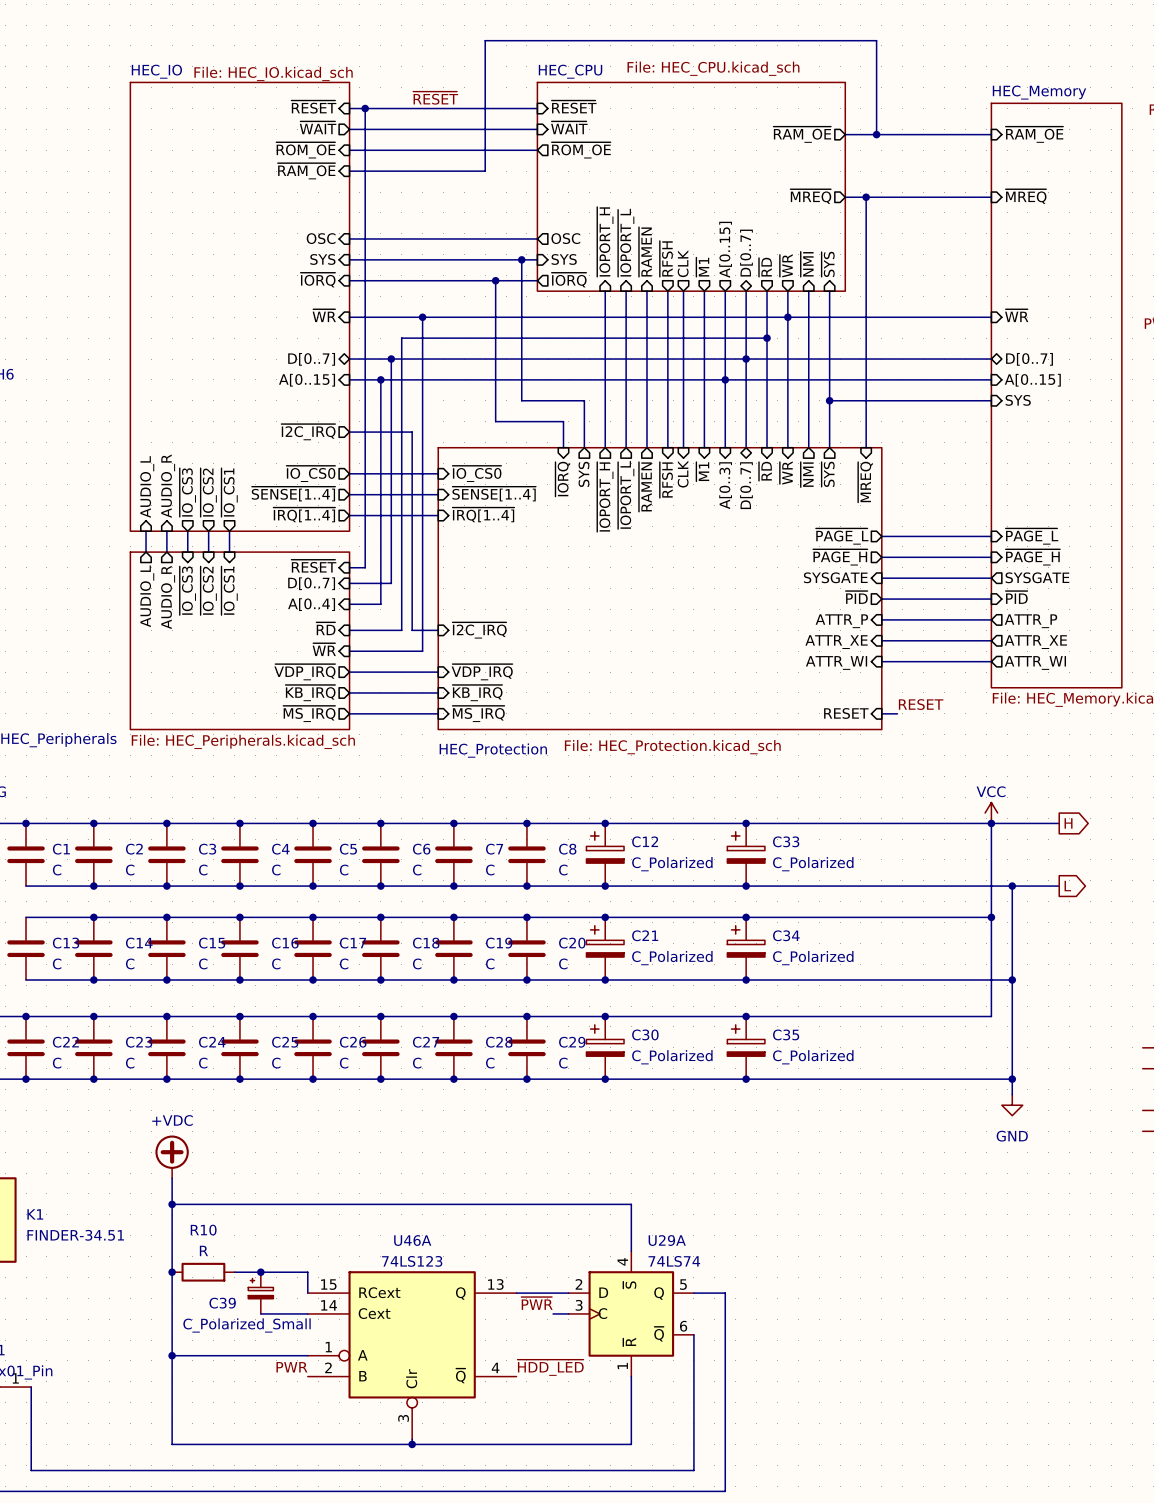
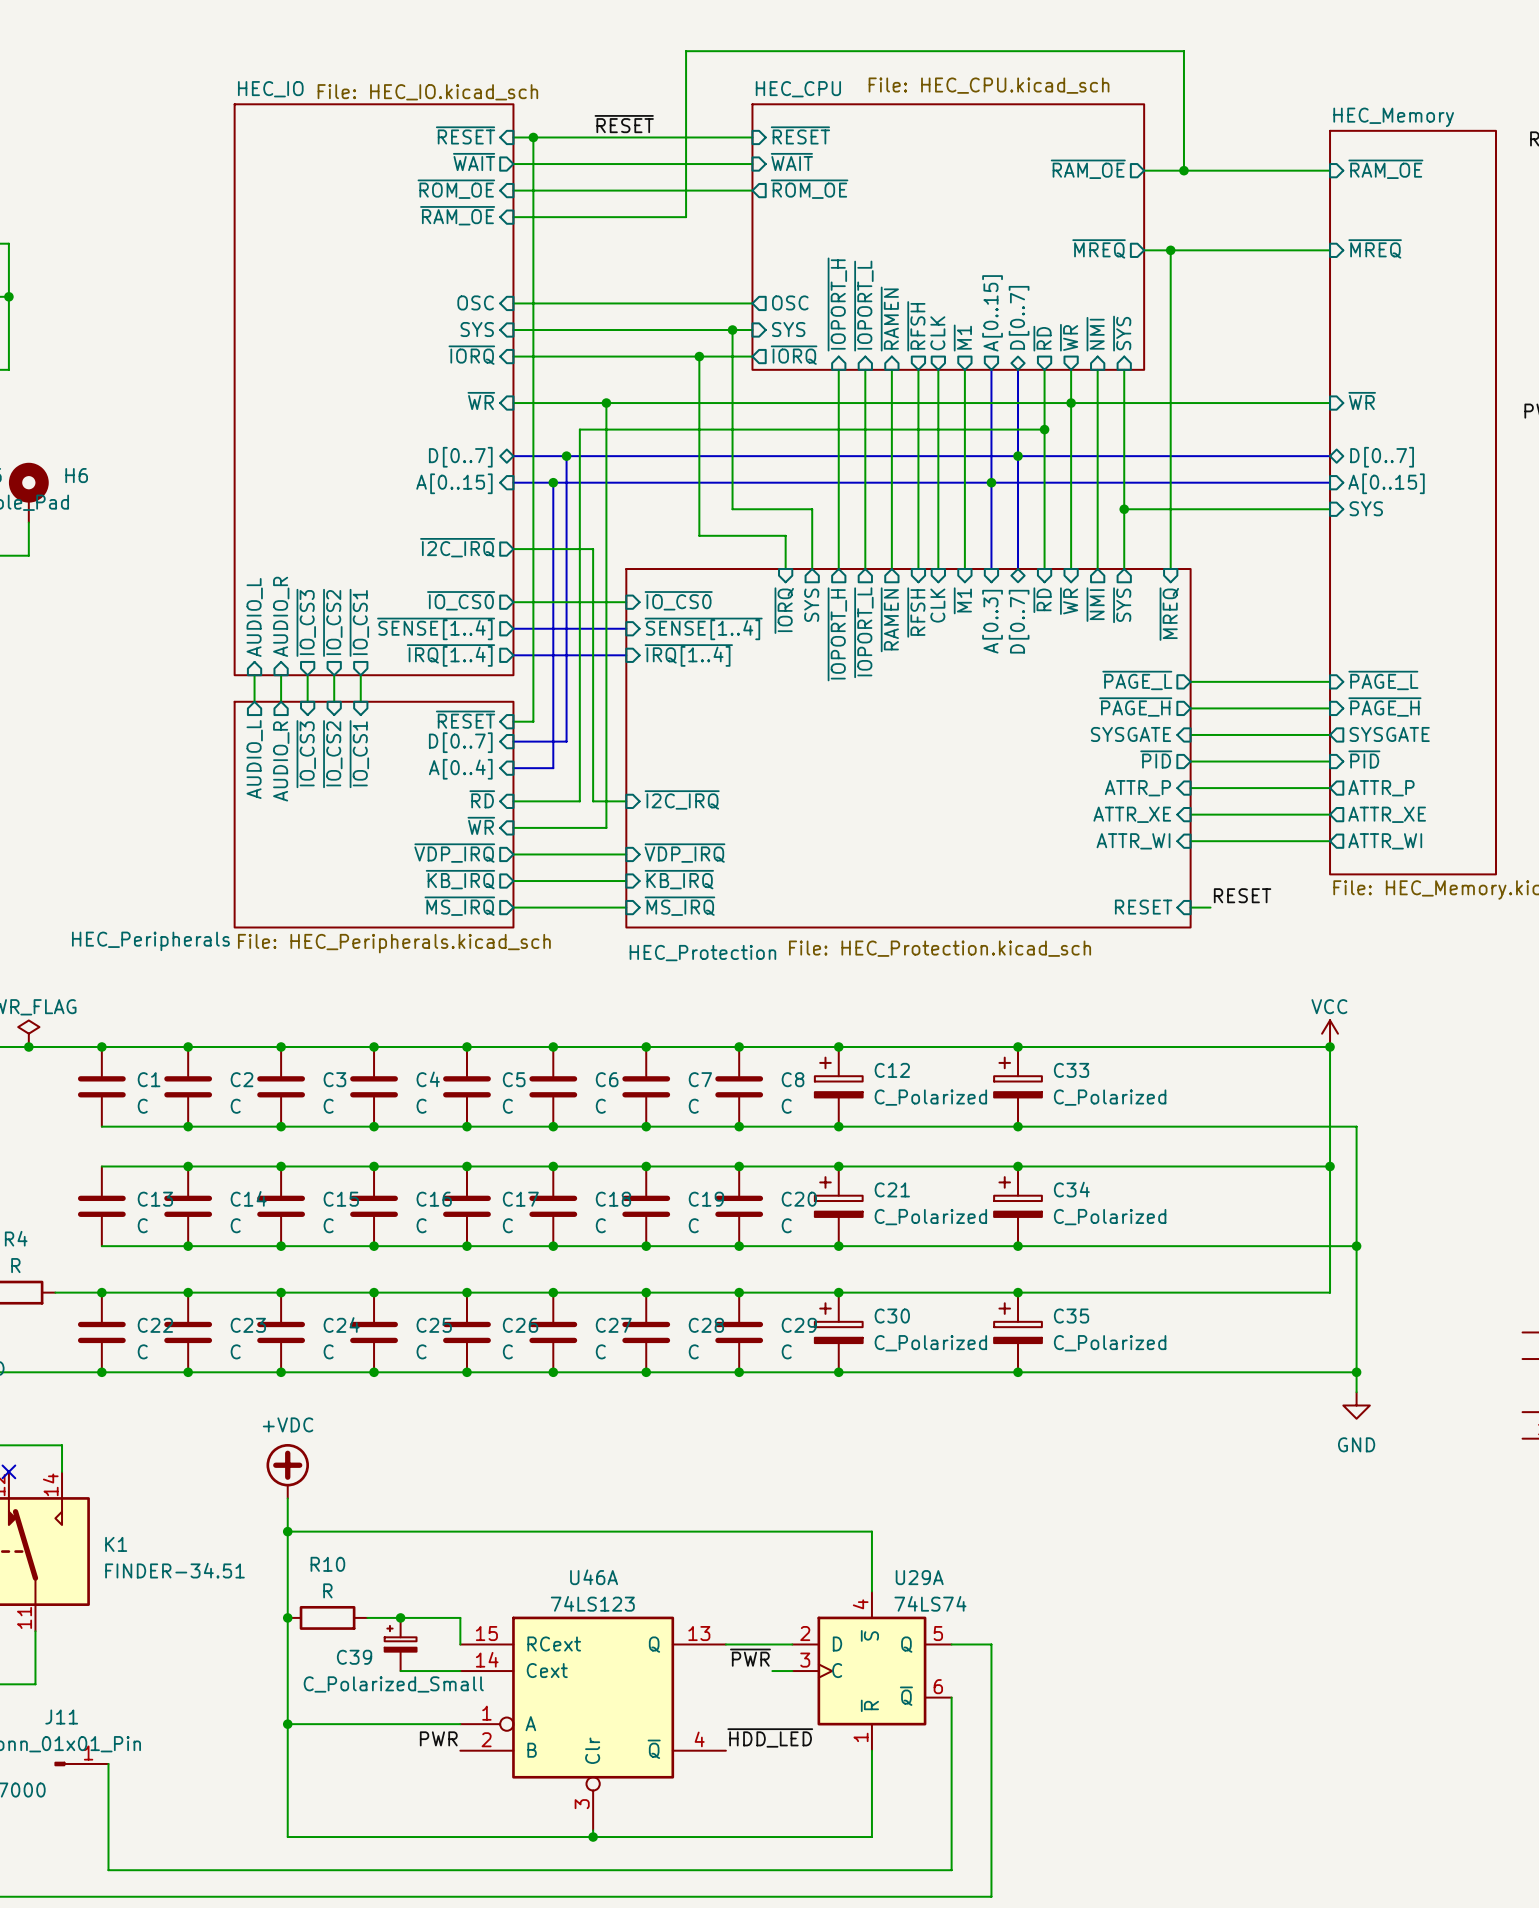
wire: (991, 823) (1059, 823) -> none
global label: H (1068, 823) -> none
wire: (1012, 886) (1059, 886) -> none
junction: (1012, 886) -> none
global label: L (1067, 886) -> none

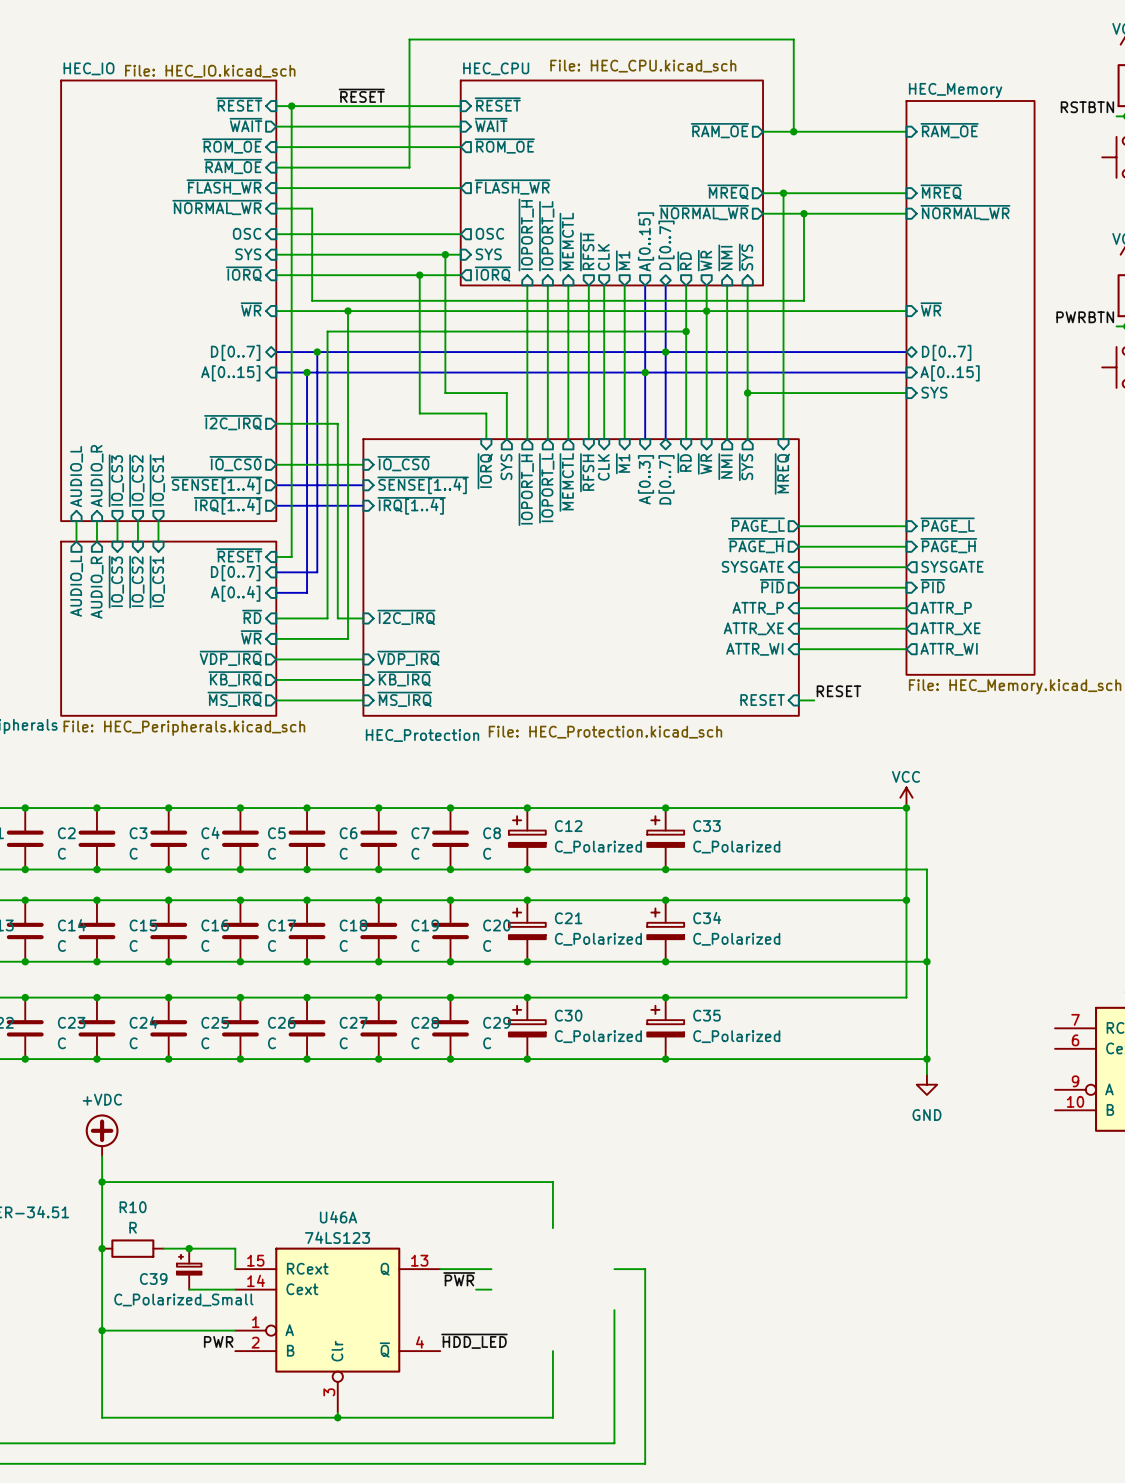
sheet pin: none -> ~{FLASH_WR} (224, 187)
sheet pin: none -> ~{FLASH_WR} (512, 187)
wire: none -> (276, 188) (460, 188)
sheet pin: none -> ~{NORMAL_WR} (217, 207)
wire: none -> (276, 208) (312, 208) (312, 300) (804, 300) (804, 213)
sheet pin: none -> ~{NORMAL_WR} (704, 212)
sheet pin: none -> ~{NORMAL_WR} (965, 212)
wire: none -> (763, 213) (906, 213)
junction: none -> (804, 213)
sheet pin: ~{RAMEN} (889, 319) -> ~{MEMCTL} (566, 242)
sheet pin: ~{RAMEN} (889, 619) -> ~{MEMCTL} (566, 482)
U29A: 74LS74 (871, 1671) -> none

